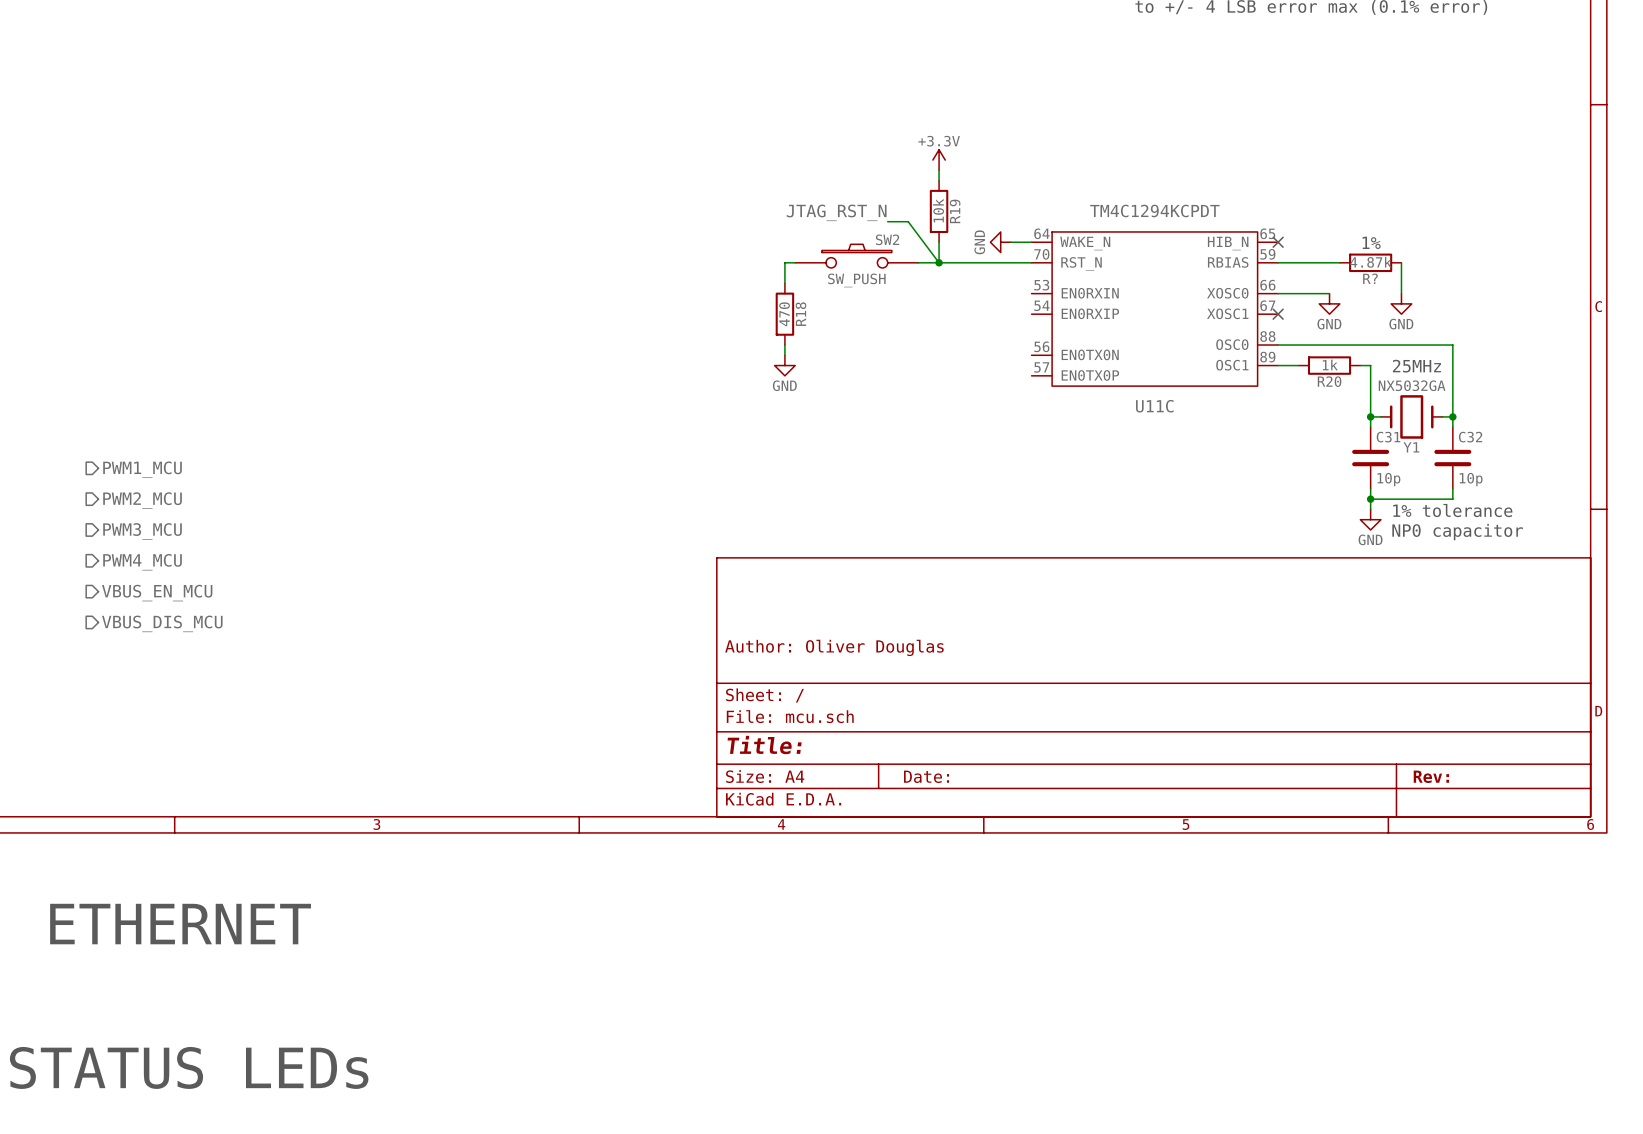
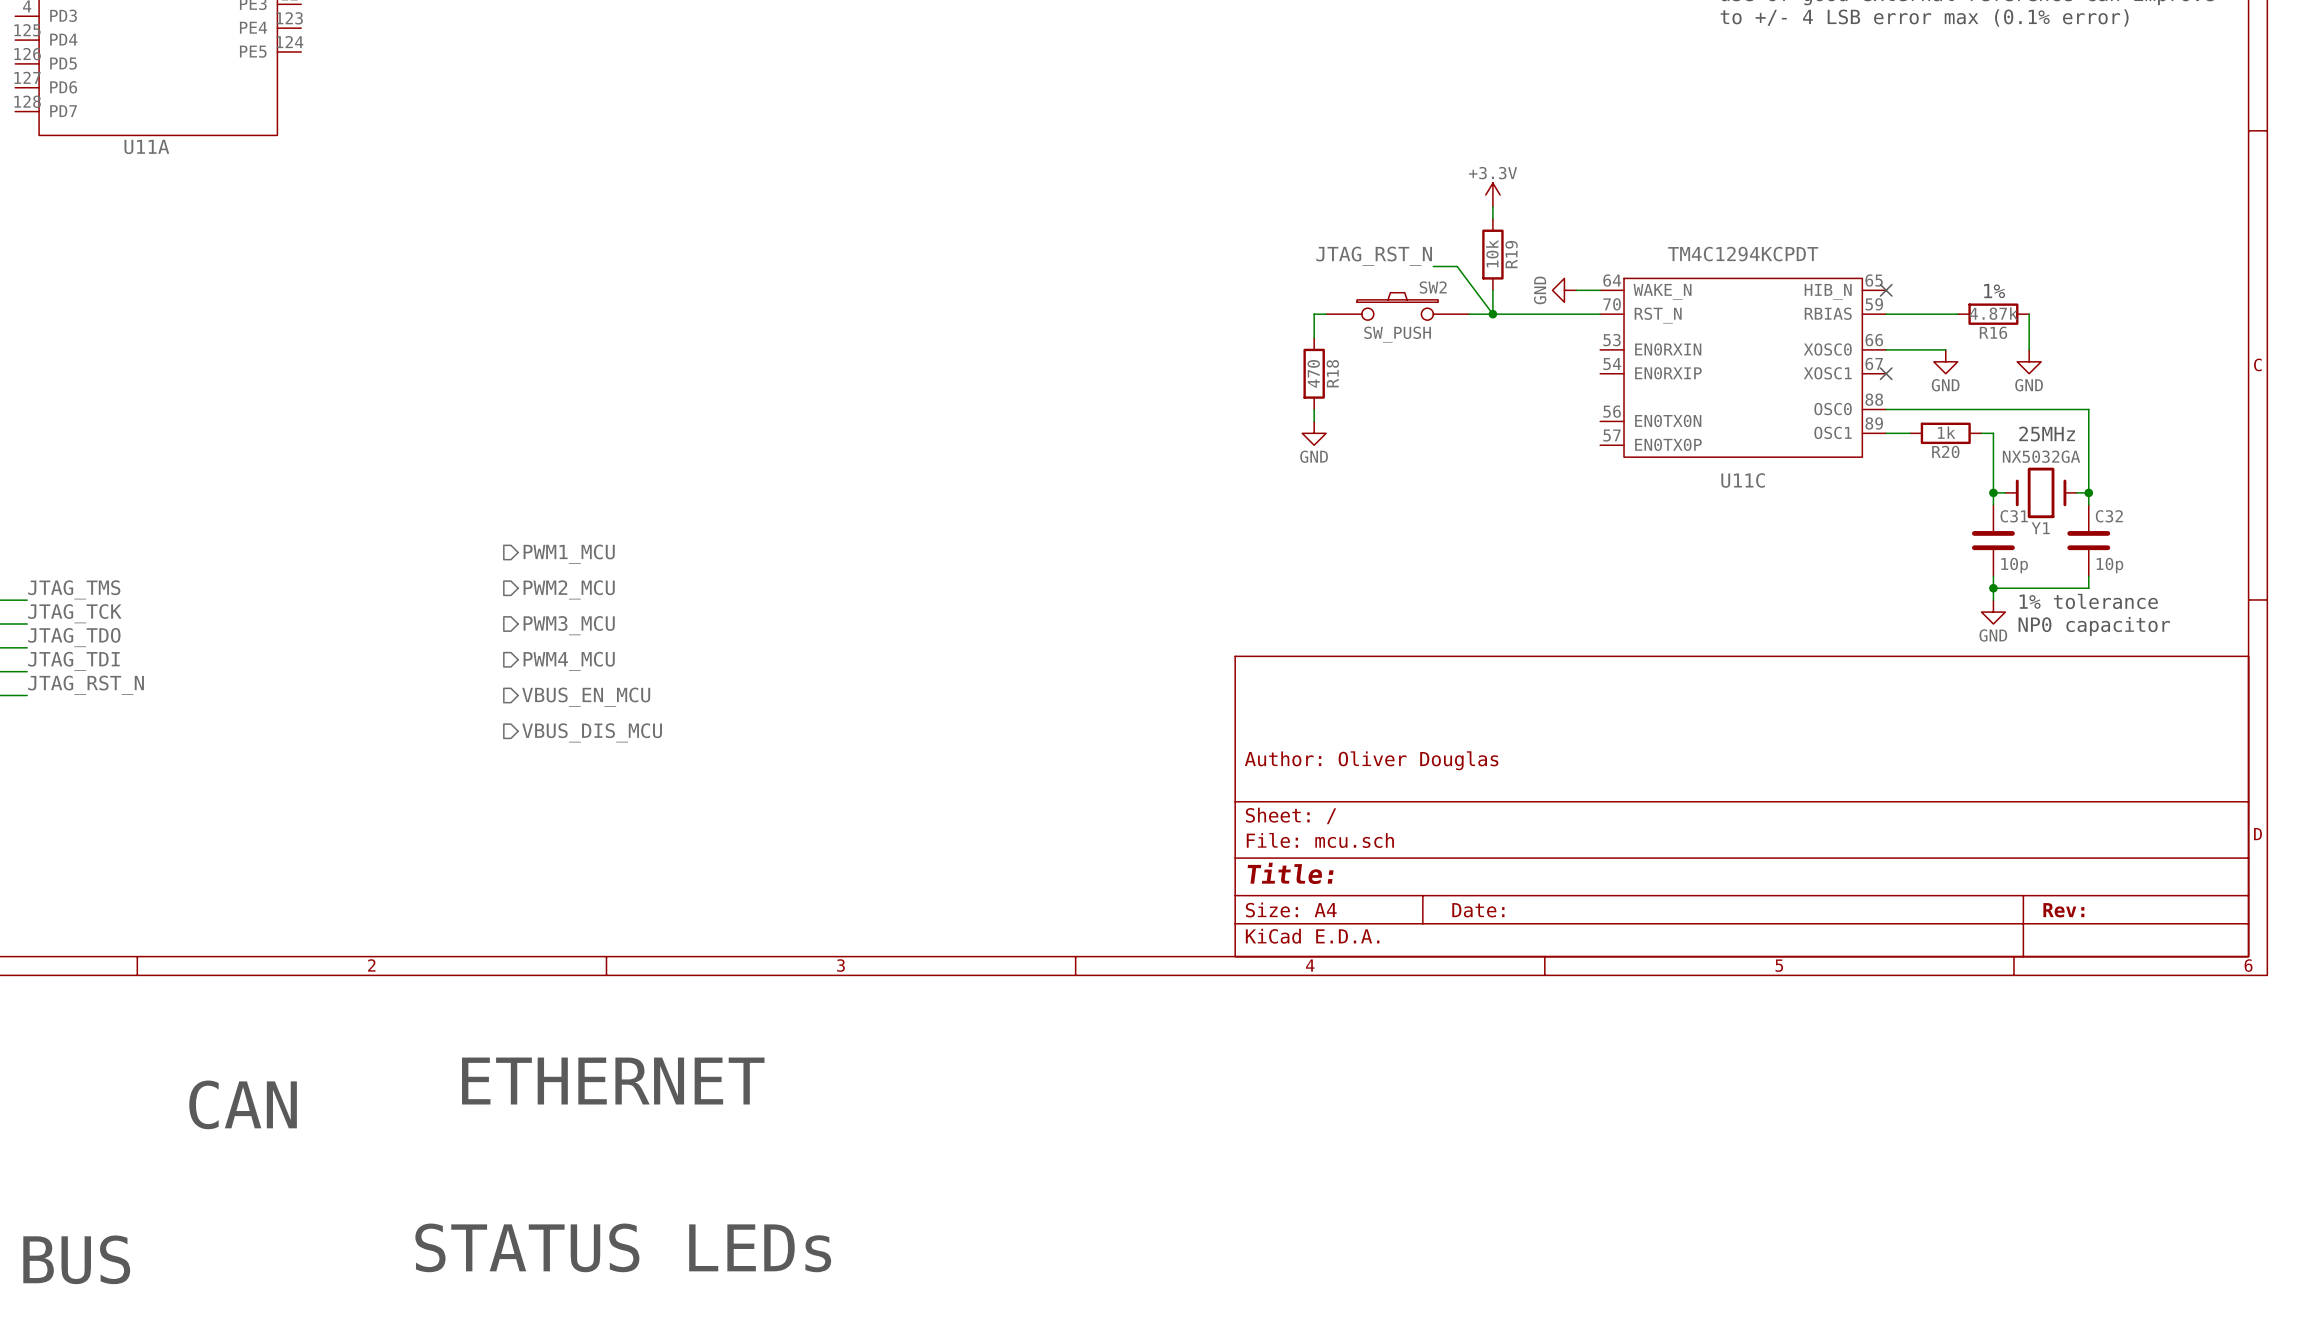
R? name: R? (1370, 278) -> R16 (1993, 332)

